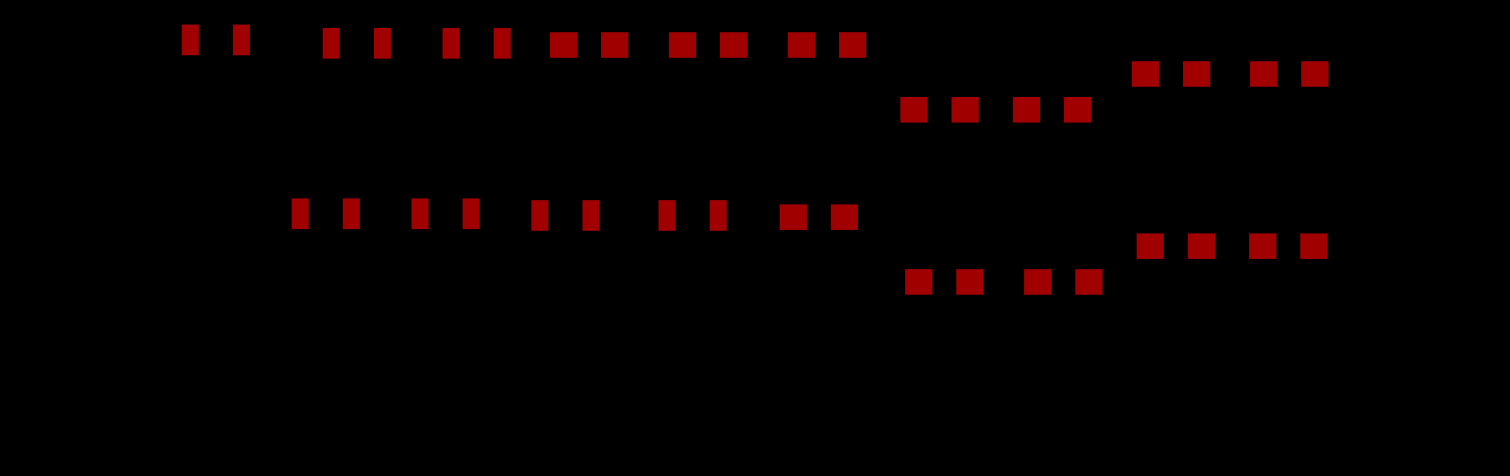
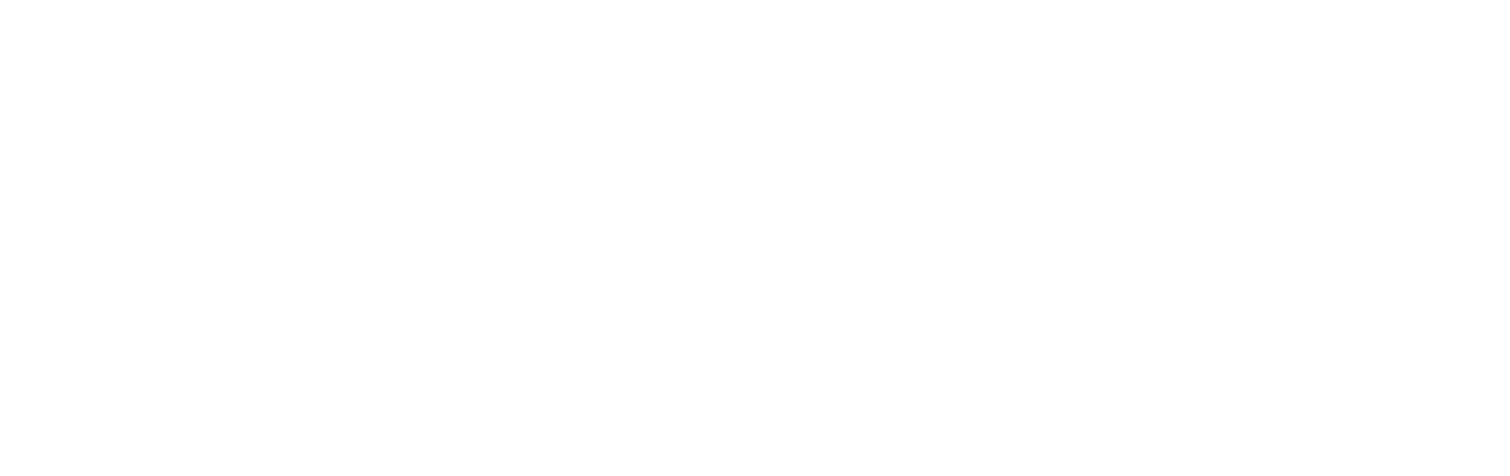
part: (215, 39) -> none
part: (356, 43) -> none
part: (476, 43) -> none
part: (589, 45) -> none
part: (708, 45) -> none
part: (827, 45) -> none
part: (1171, 73) -> none
part: (1289, 73) -> none
part: (939, 109) -> none
part: (1052, 109) -> none
part: (325, 213) -> none
part: (445, 213) -> none
part: (565, 215) -> none
part: (692, 215) -> none
part: (818, 217) -> none
part: (1175, 246) -> none
part: (1288, 246) -> none
part: (944, 281) -> none
part: (1063, 281) -> none

